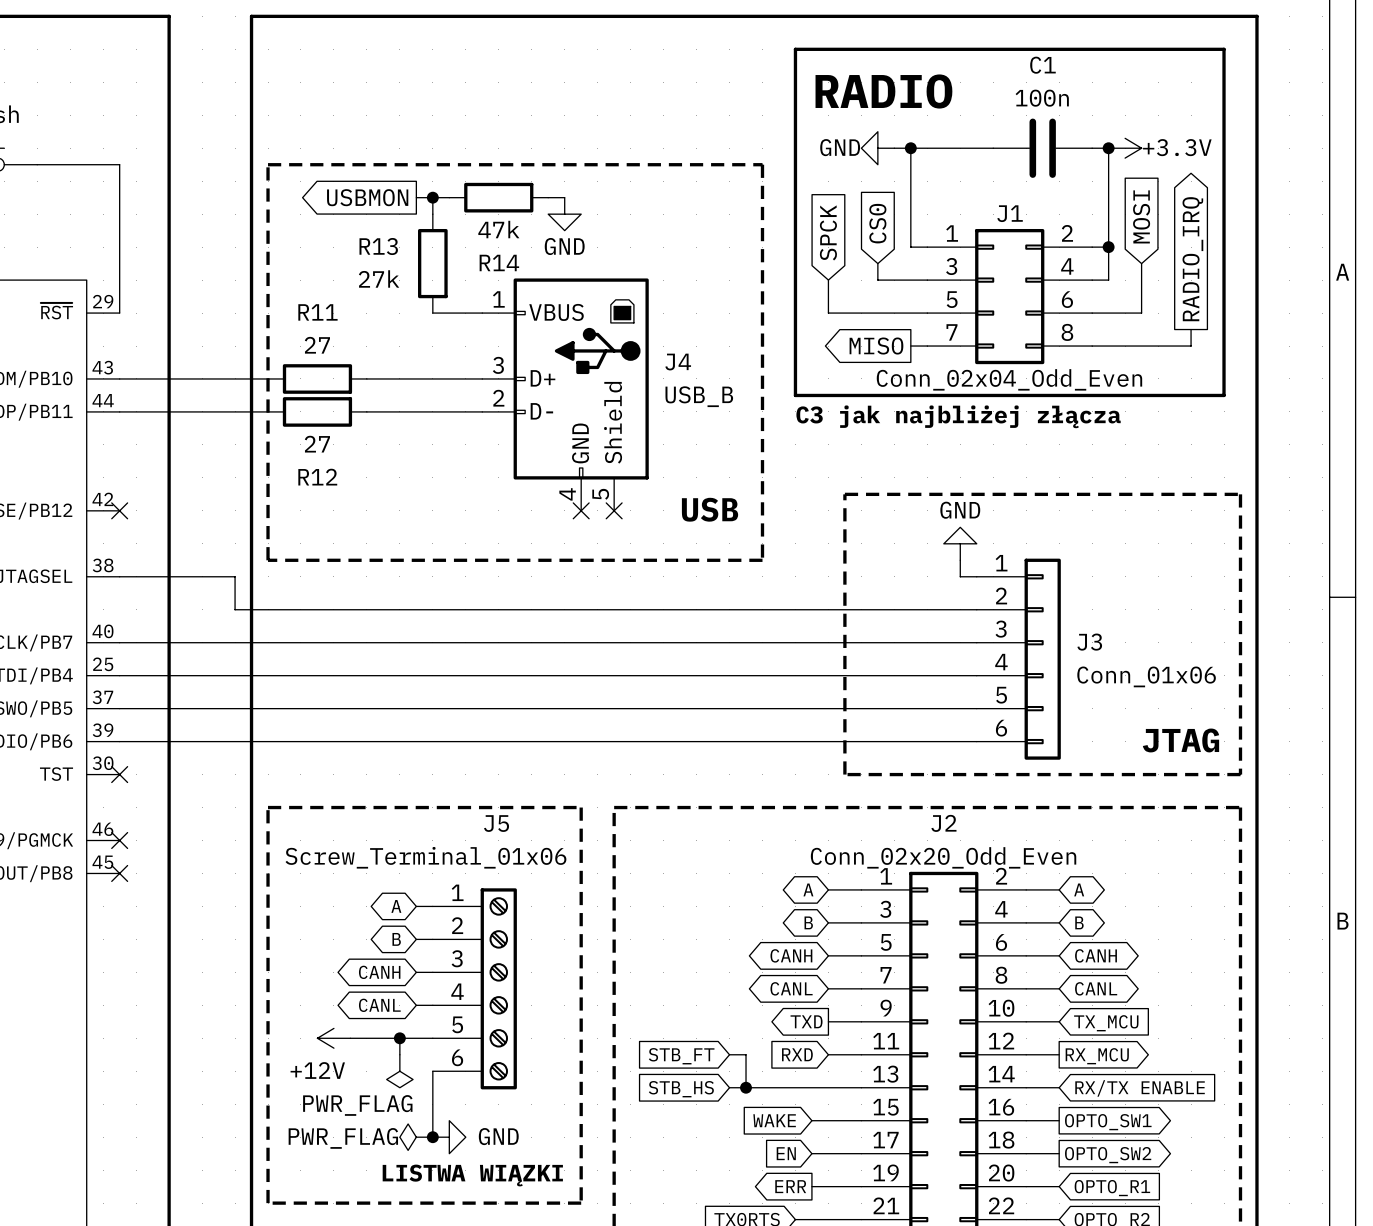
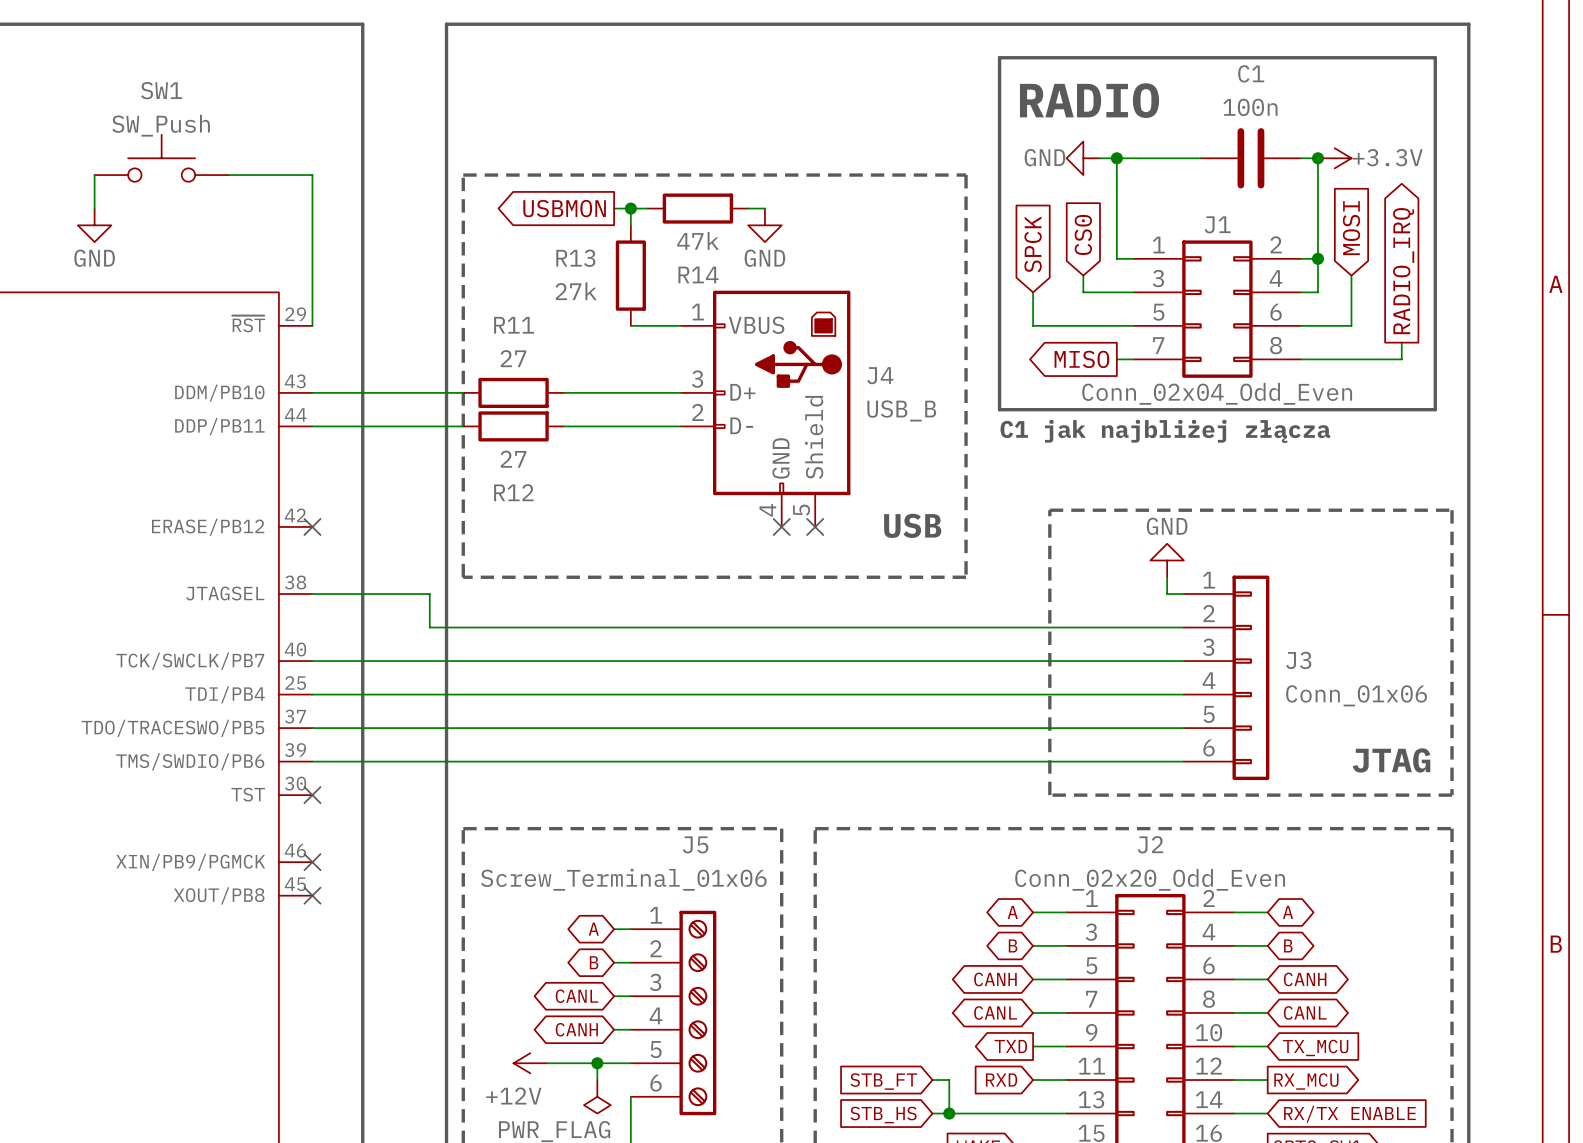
text: C3 jak najbliżej złącza (958, 416) -> C1 jak najbliżej złącza (1165, 431)
global label: CANH (379, 972) -> CANL (576, 996)
global label: CANL (379, 1005) -> CANH (576, 1029)

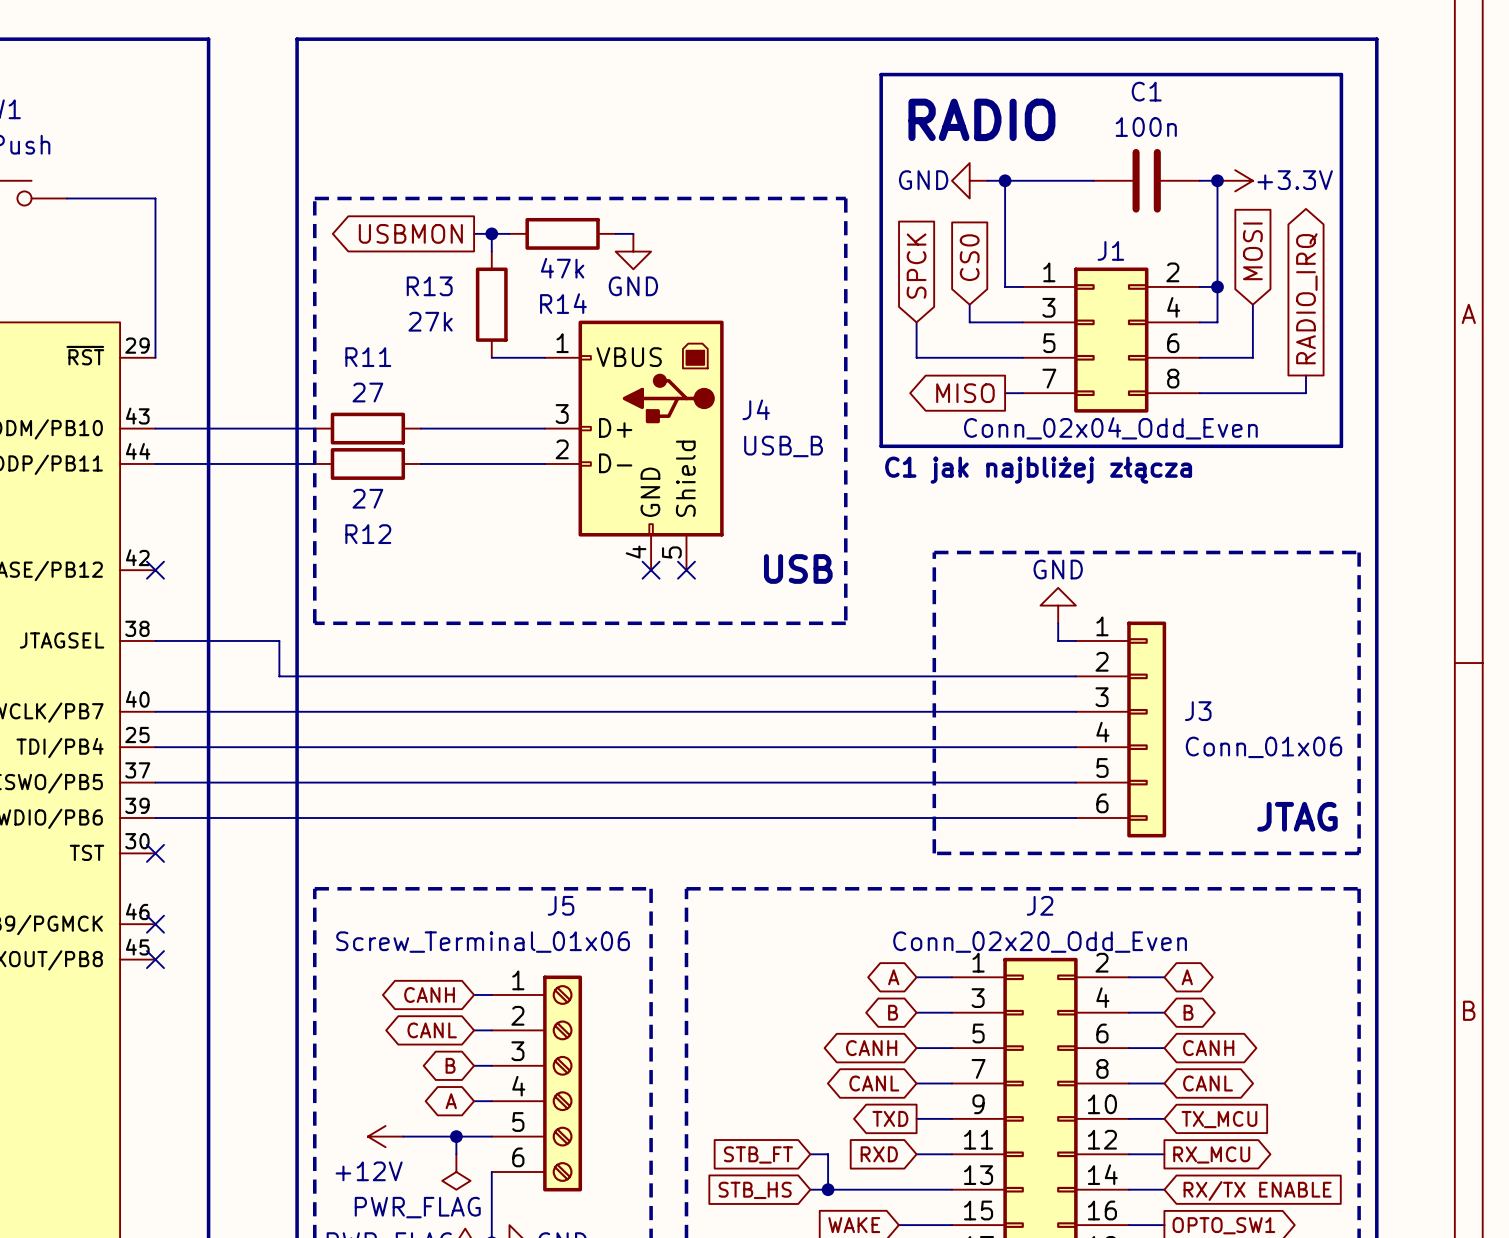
global label: A (593, 929) -> CANH (429, 994)
global label: B (594, 962) -> CANL (432, 1030)
global label: CANL (576, 996) -> B (450, 1065)
global label: CANH (576, 1029) -> A (451, 1101)

